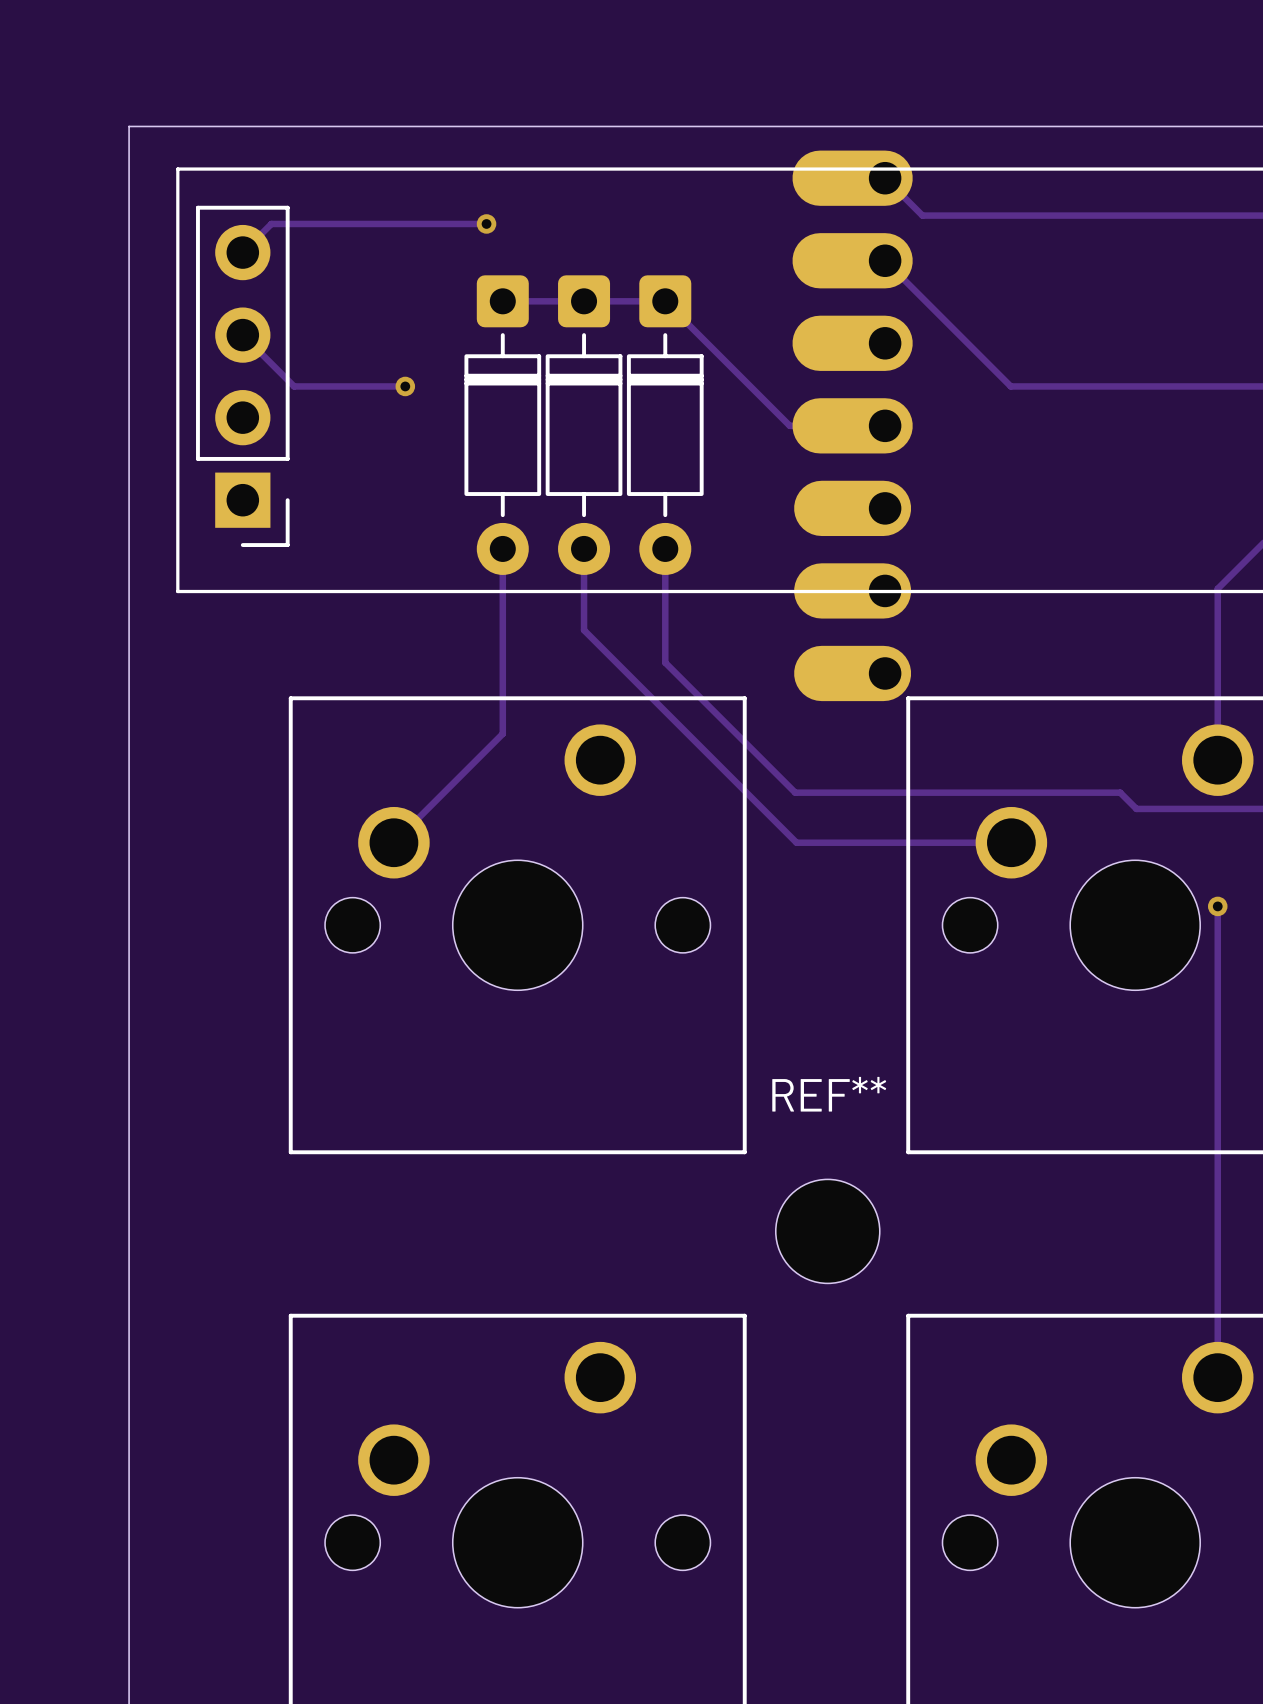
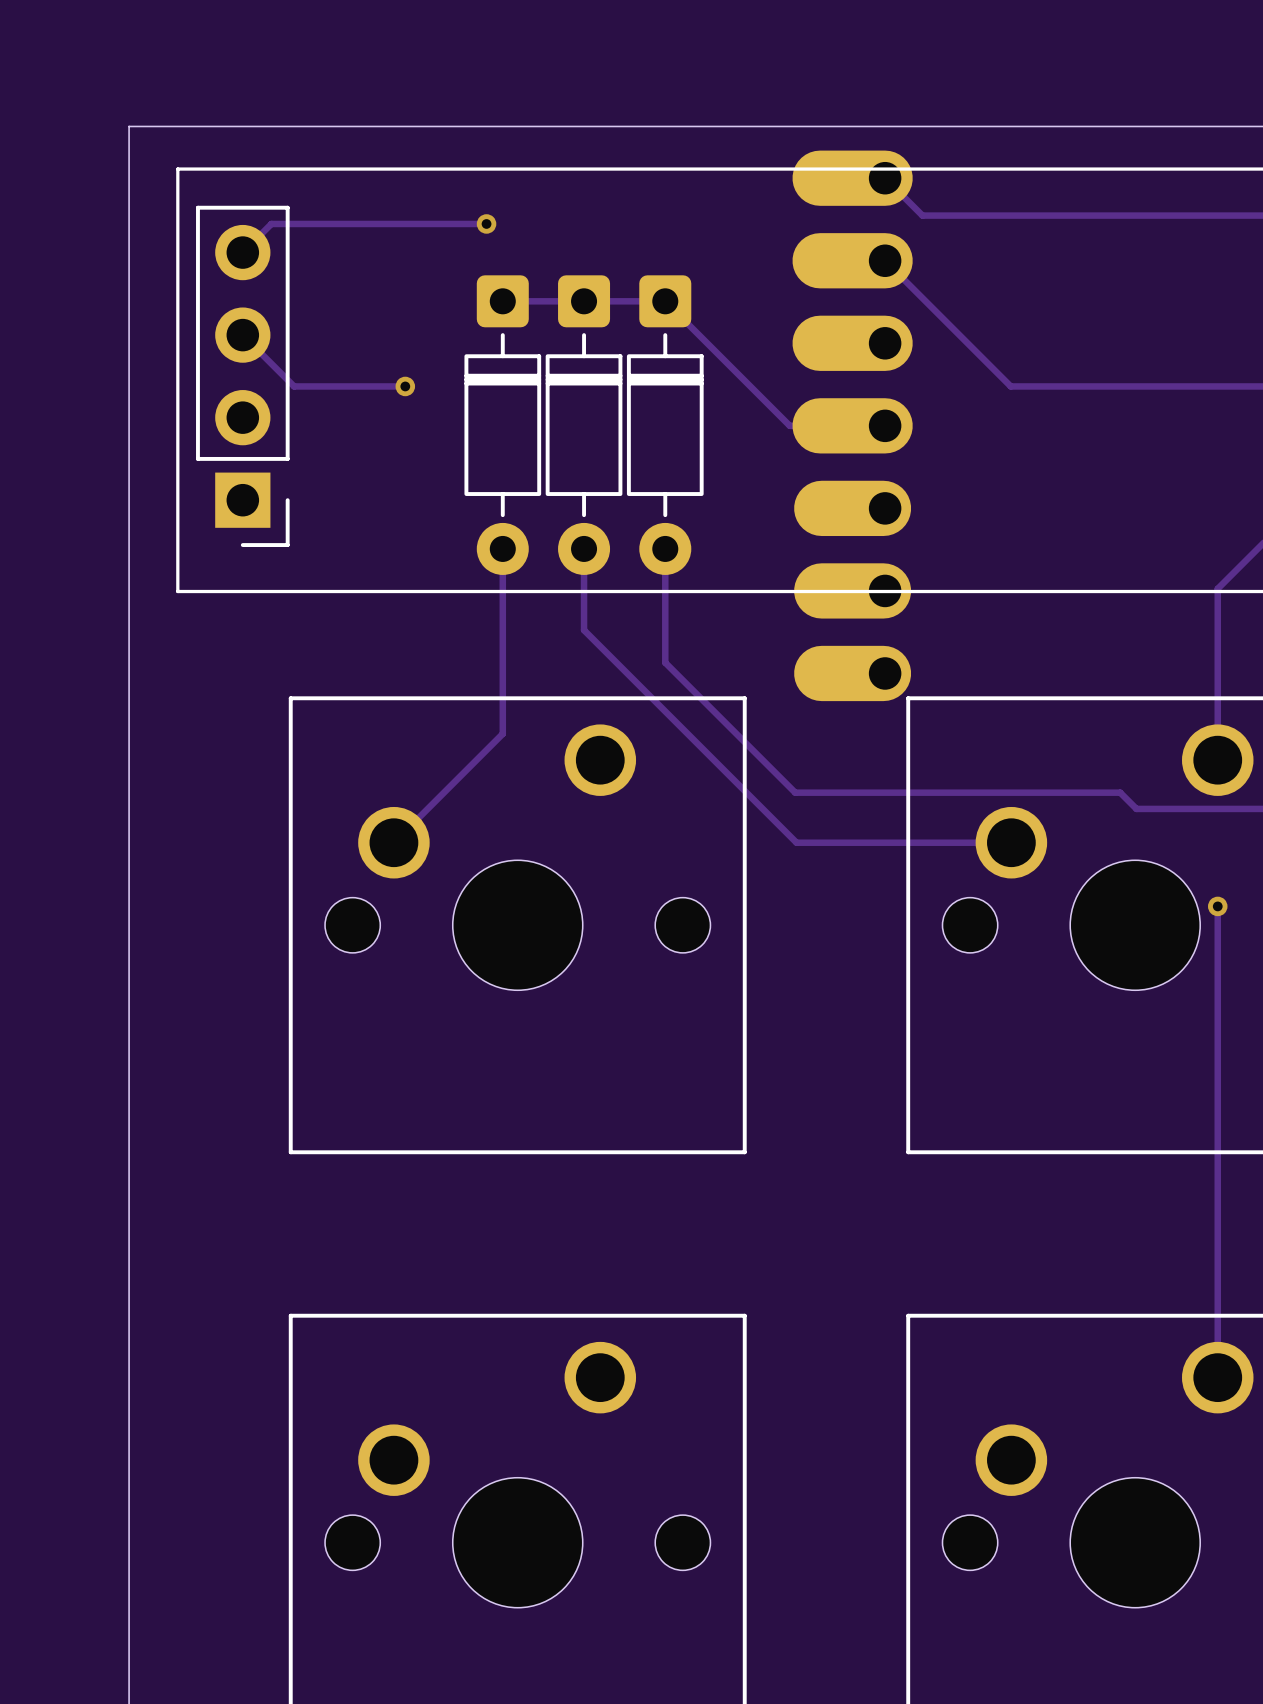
REF**: (827, 1231) -> none

